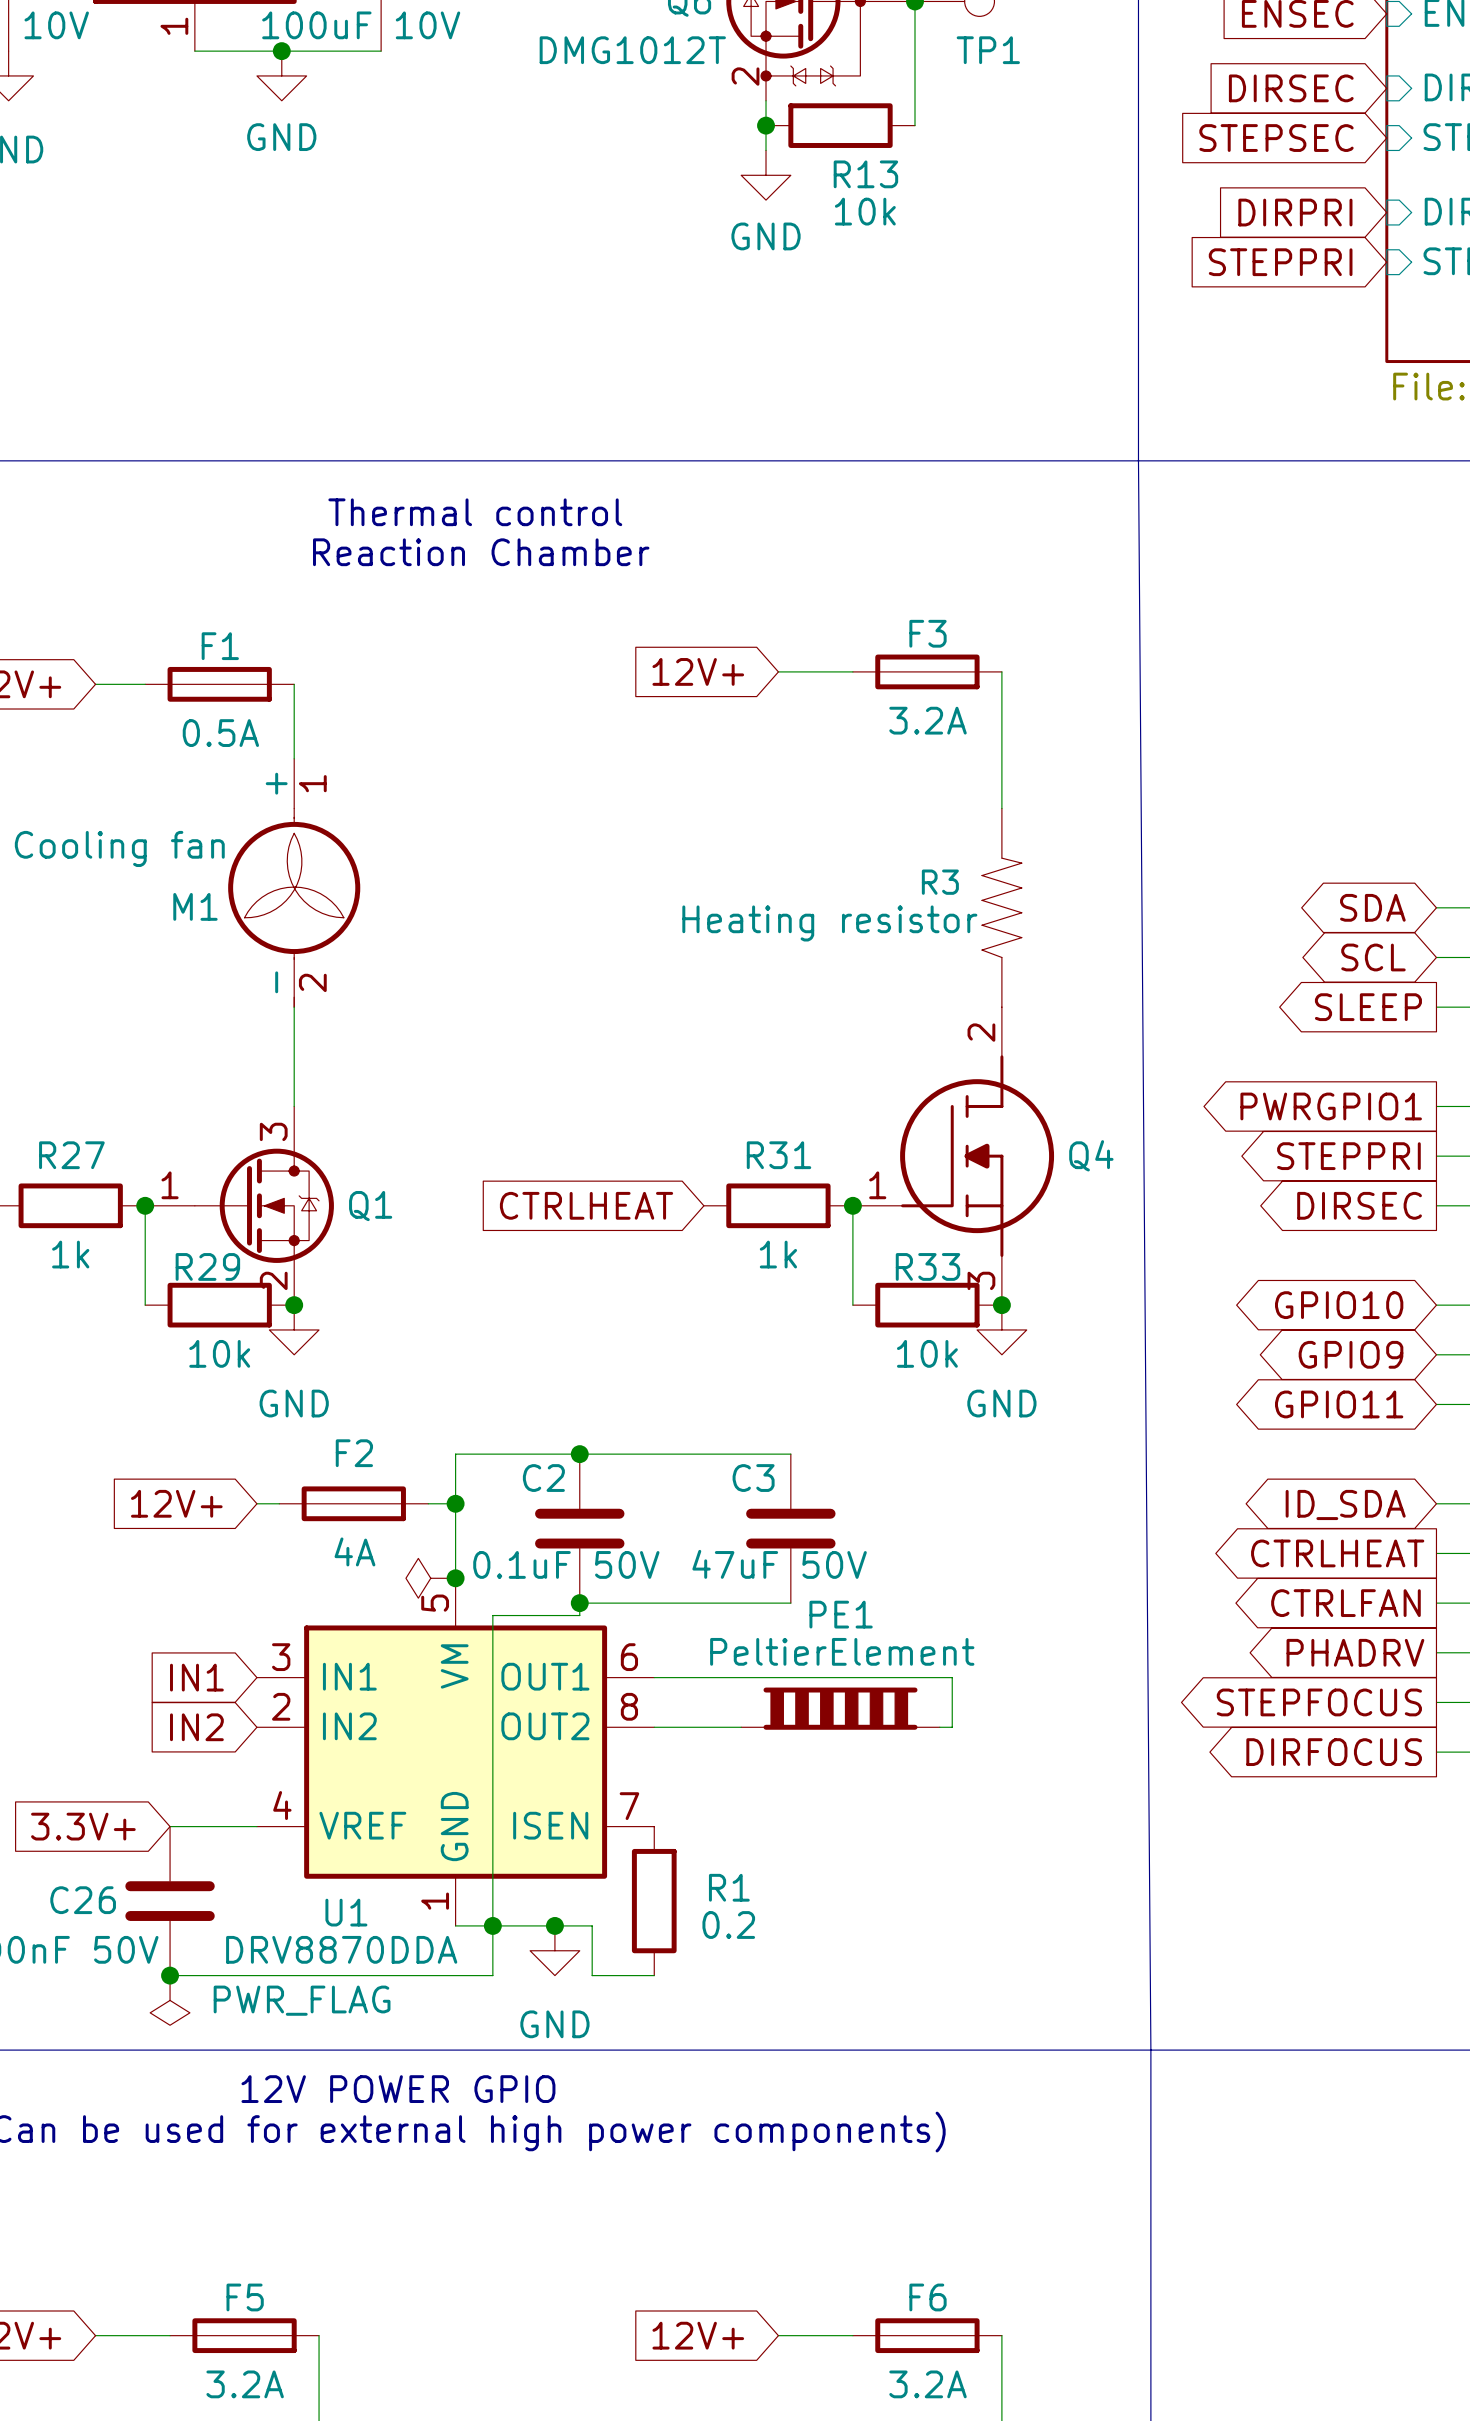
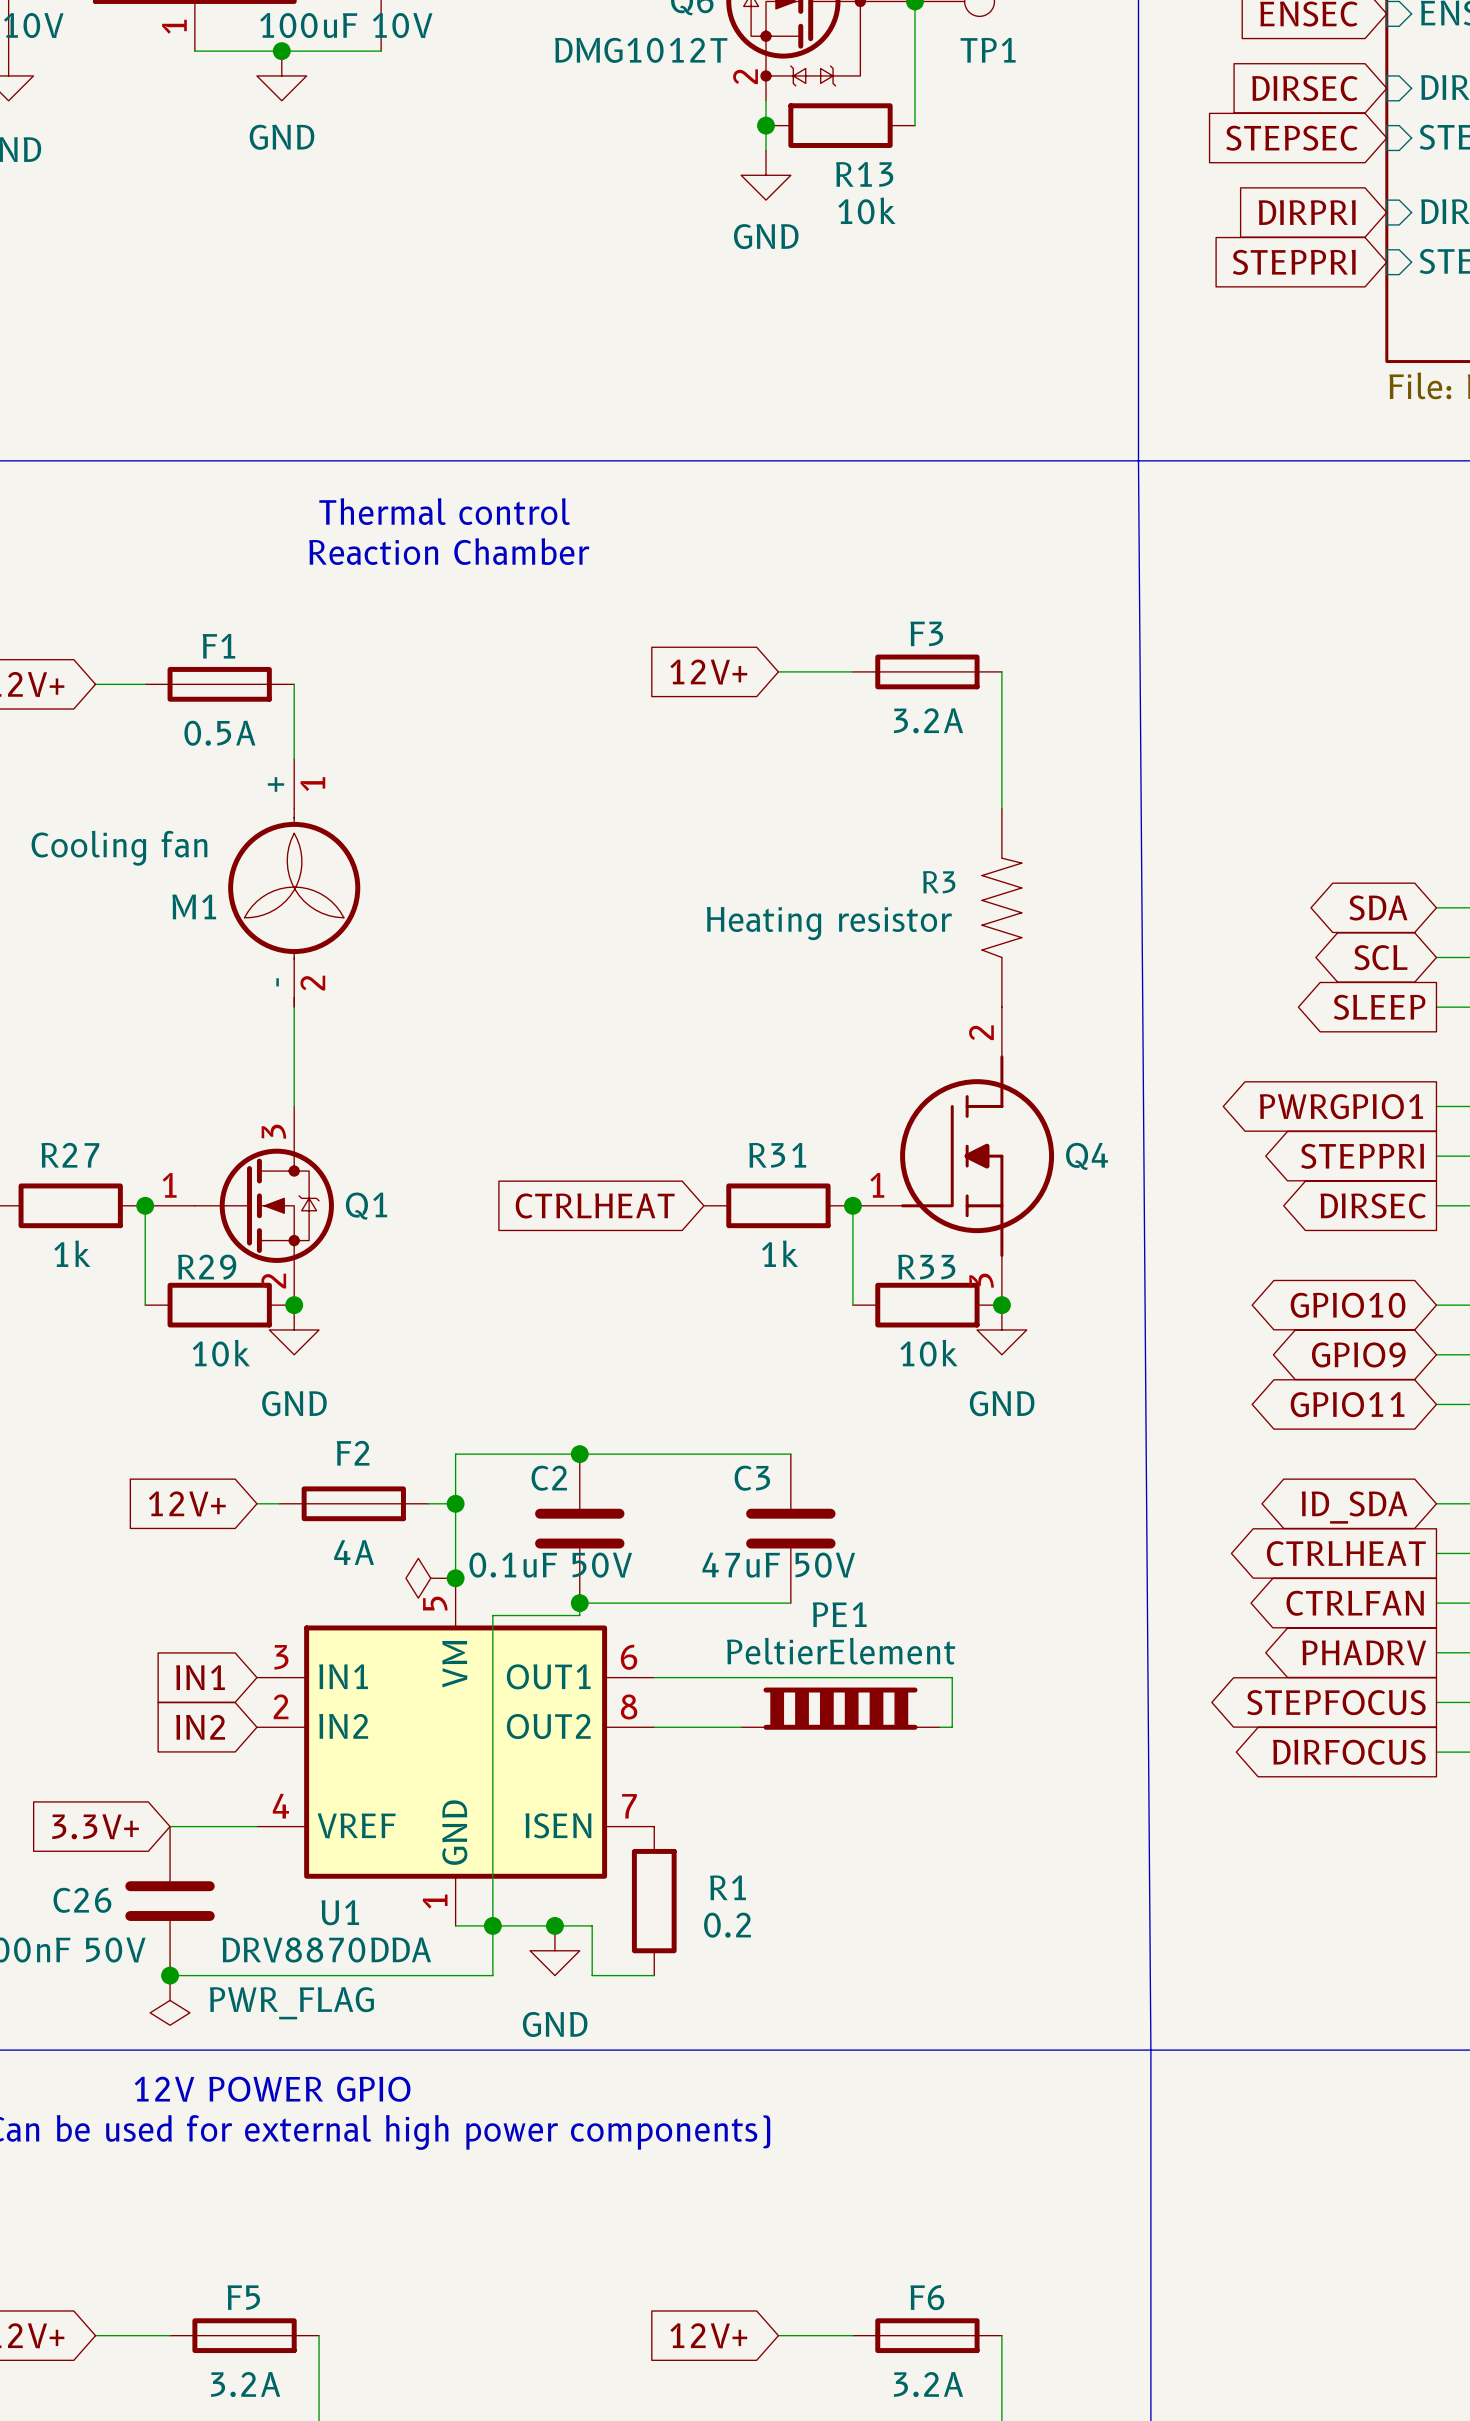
C2 name position: C2 (543, 1478) -> C2 (549, 1478)

